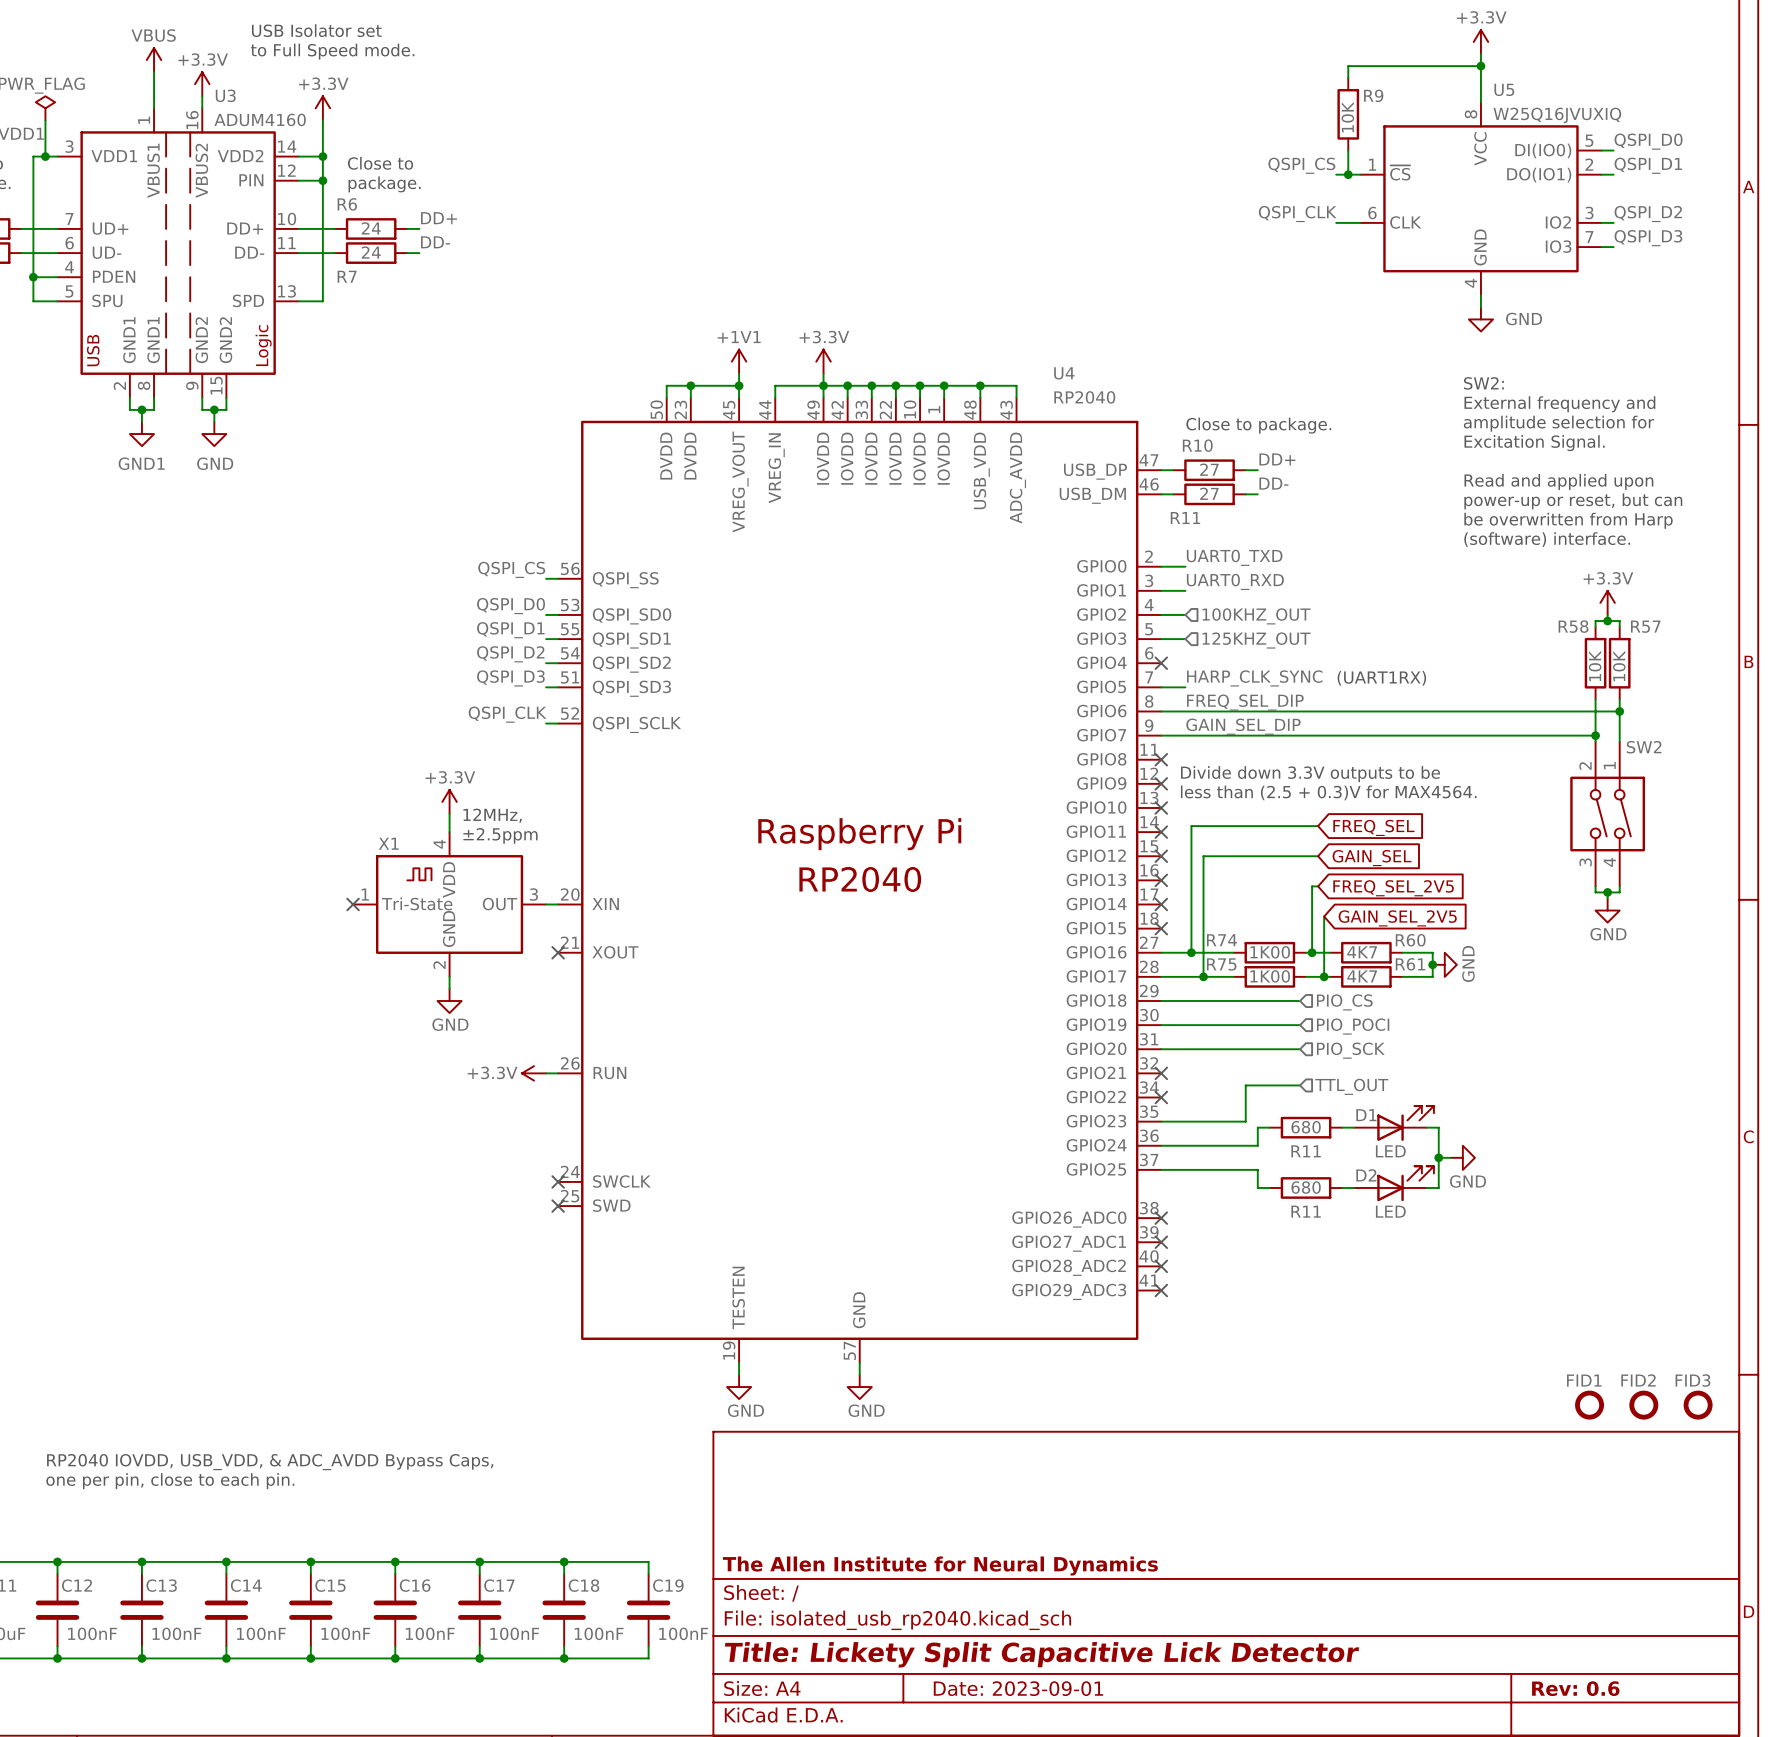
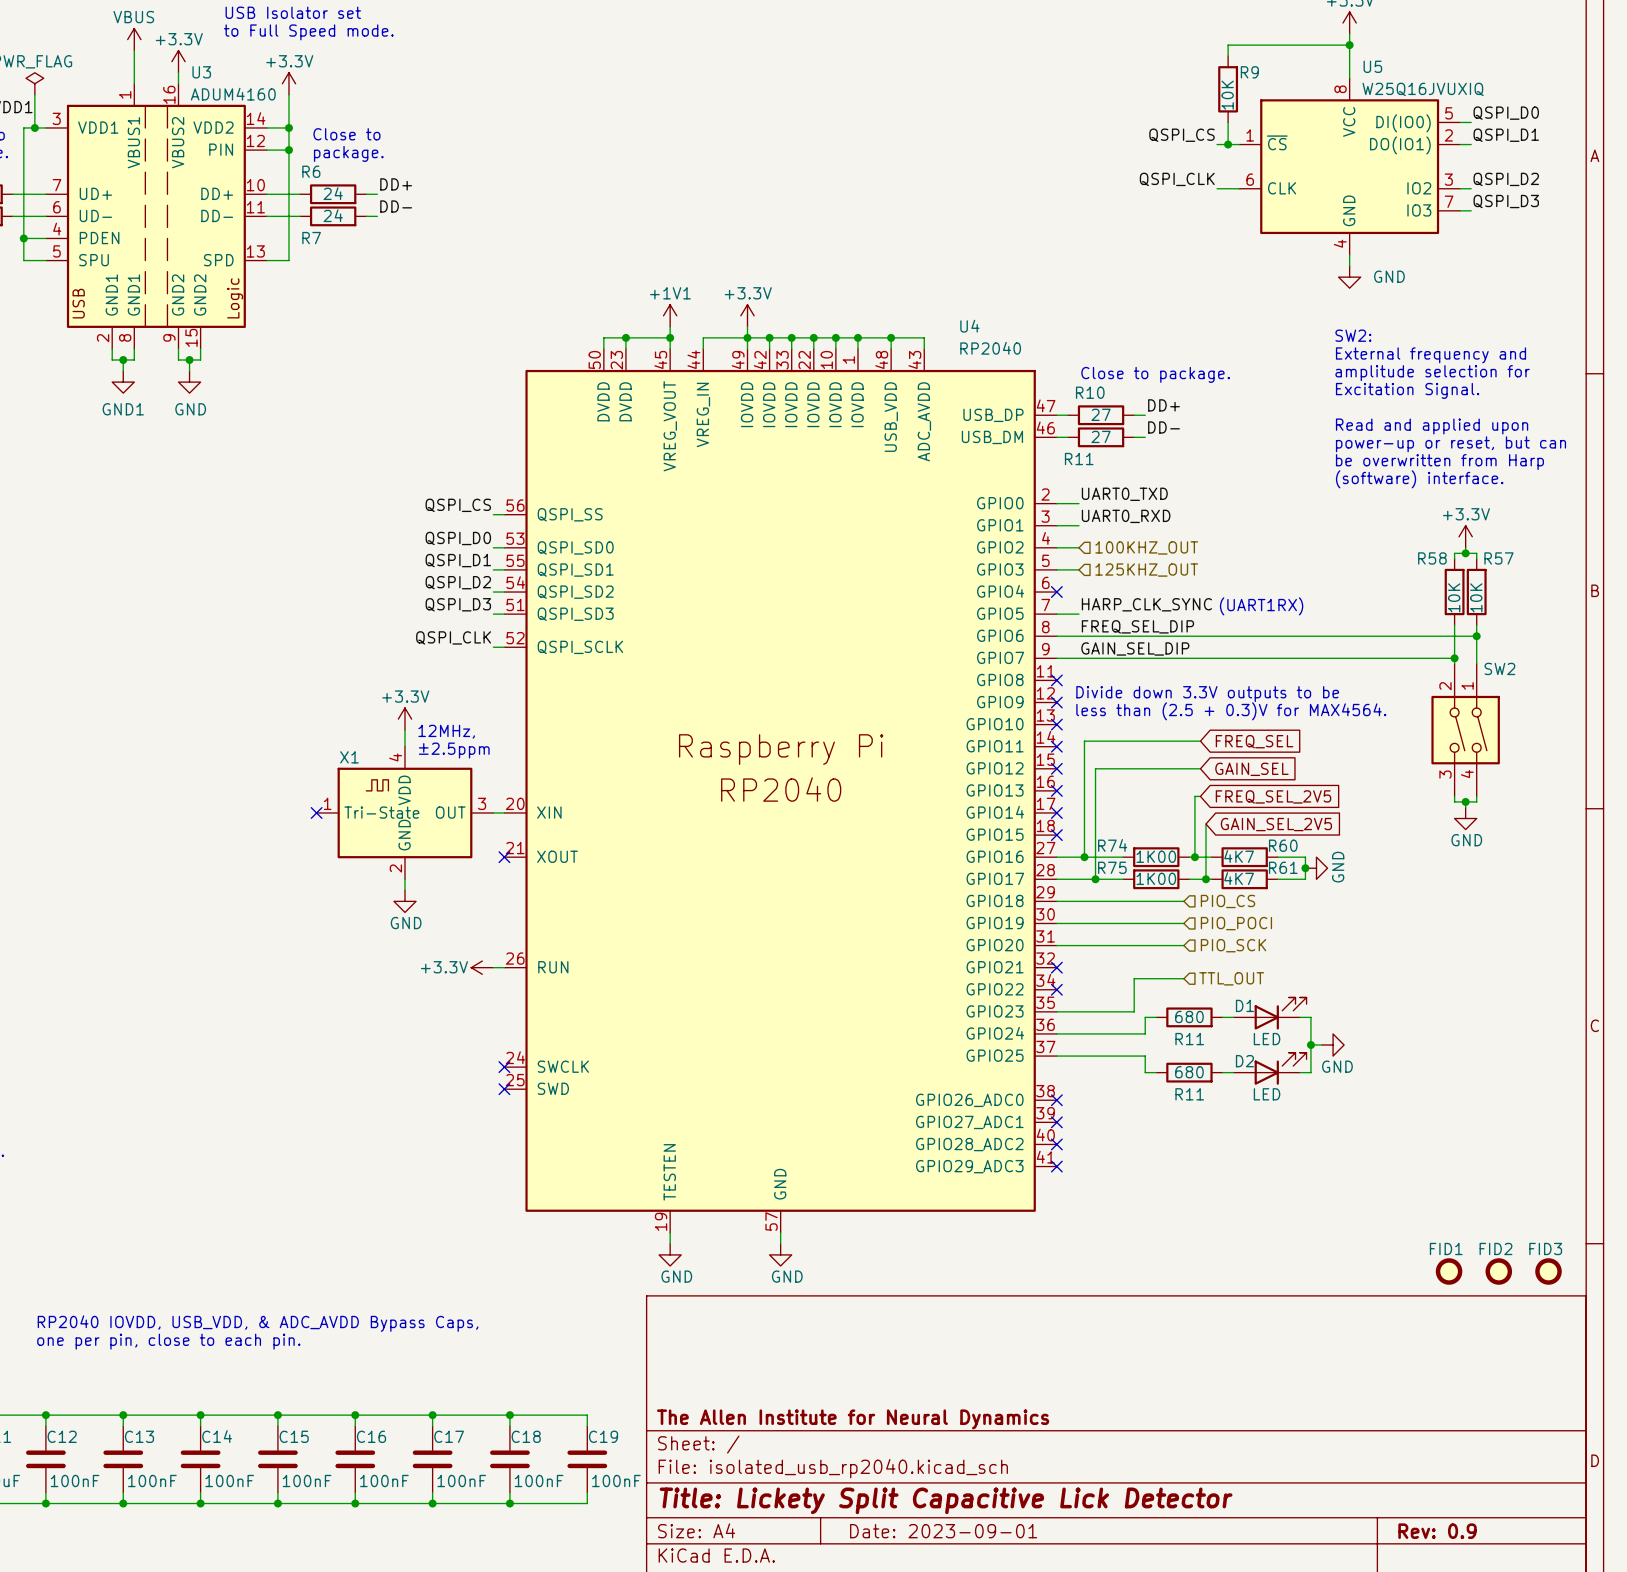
title block: Rev: 0.6 (1575, 1688) -> Rev: 0.9 (1437, 1531)

